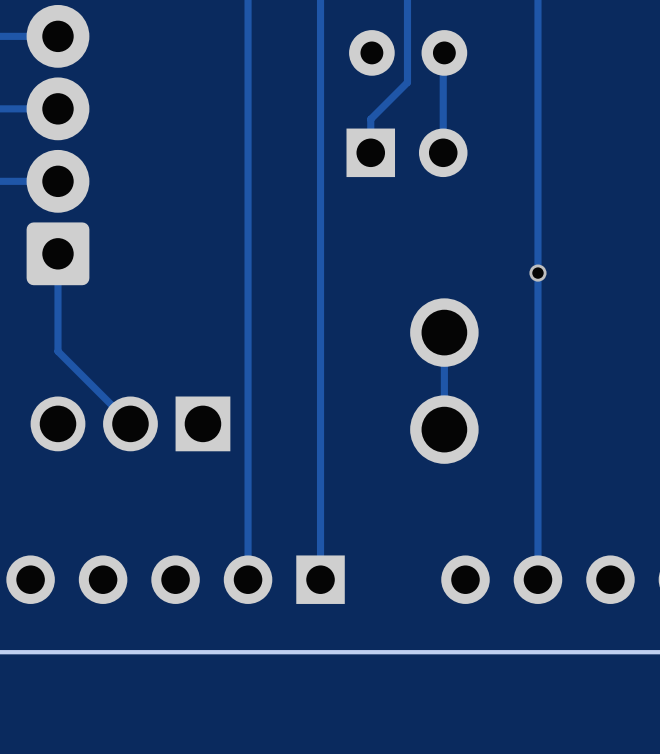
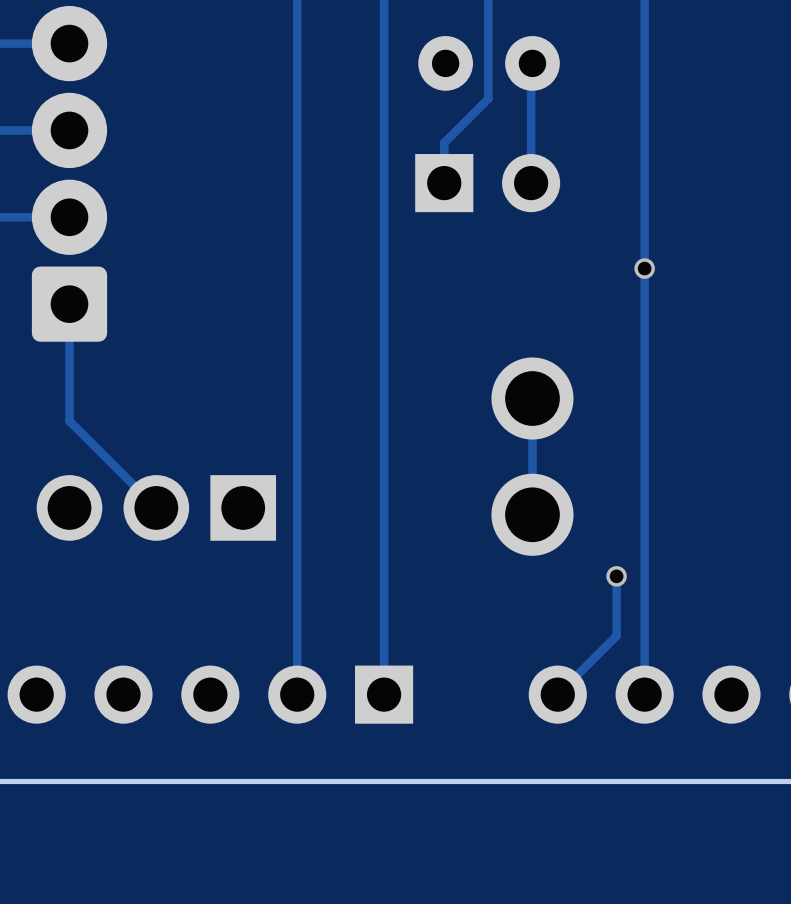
via position: (537, 273) -> (644, 268)
track: none -> (616, 576) (616, 635) (557, 694)
via: none -> (616, 576)

